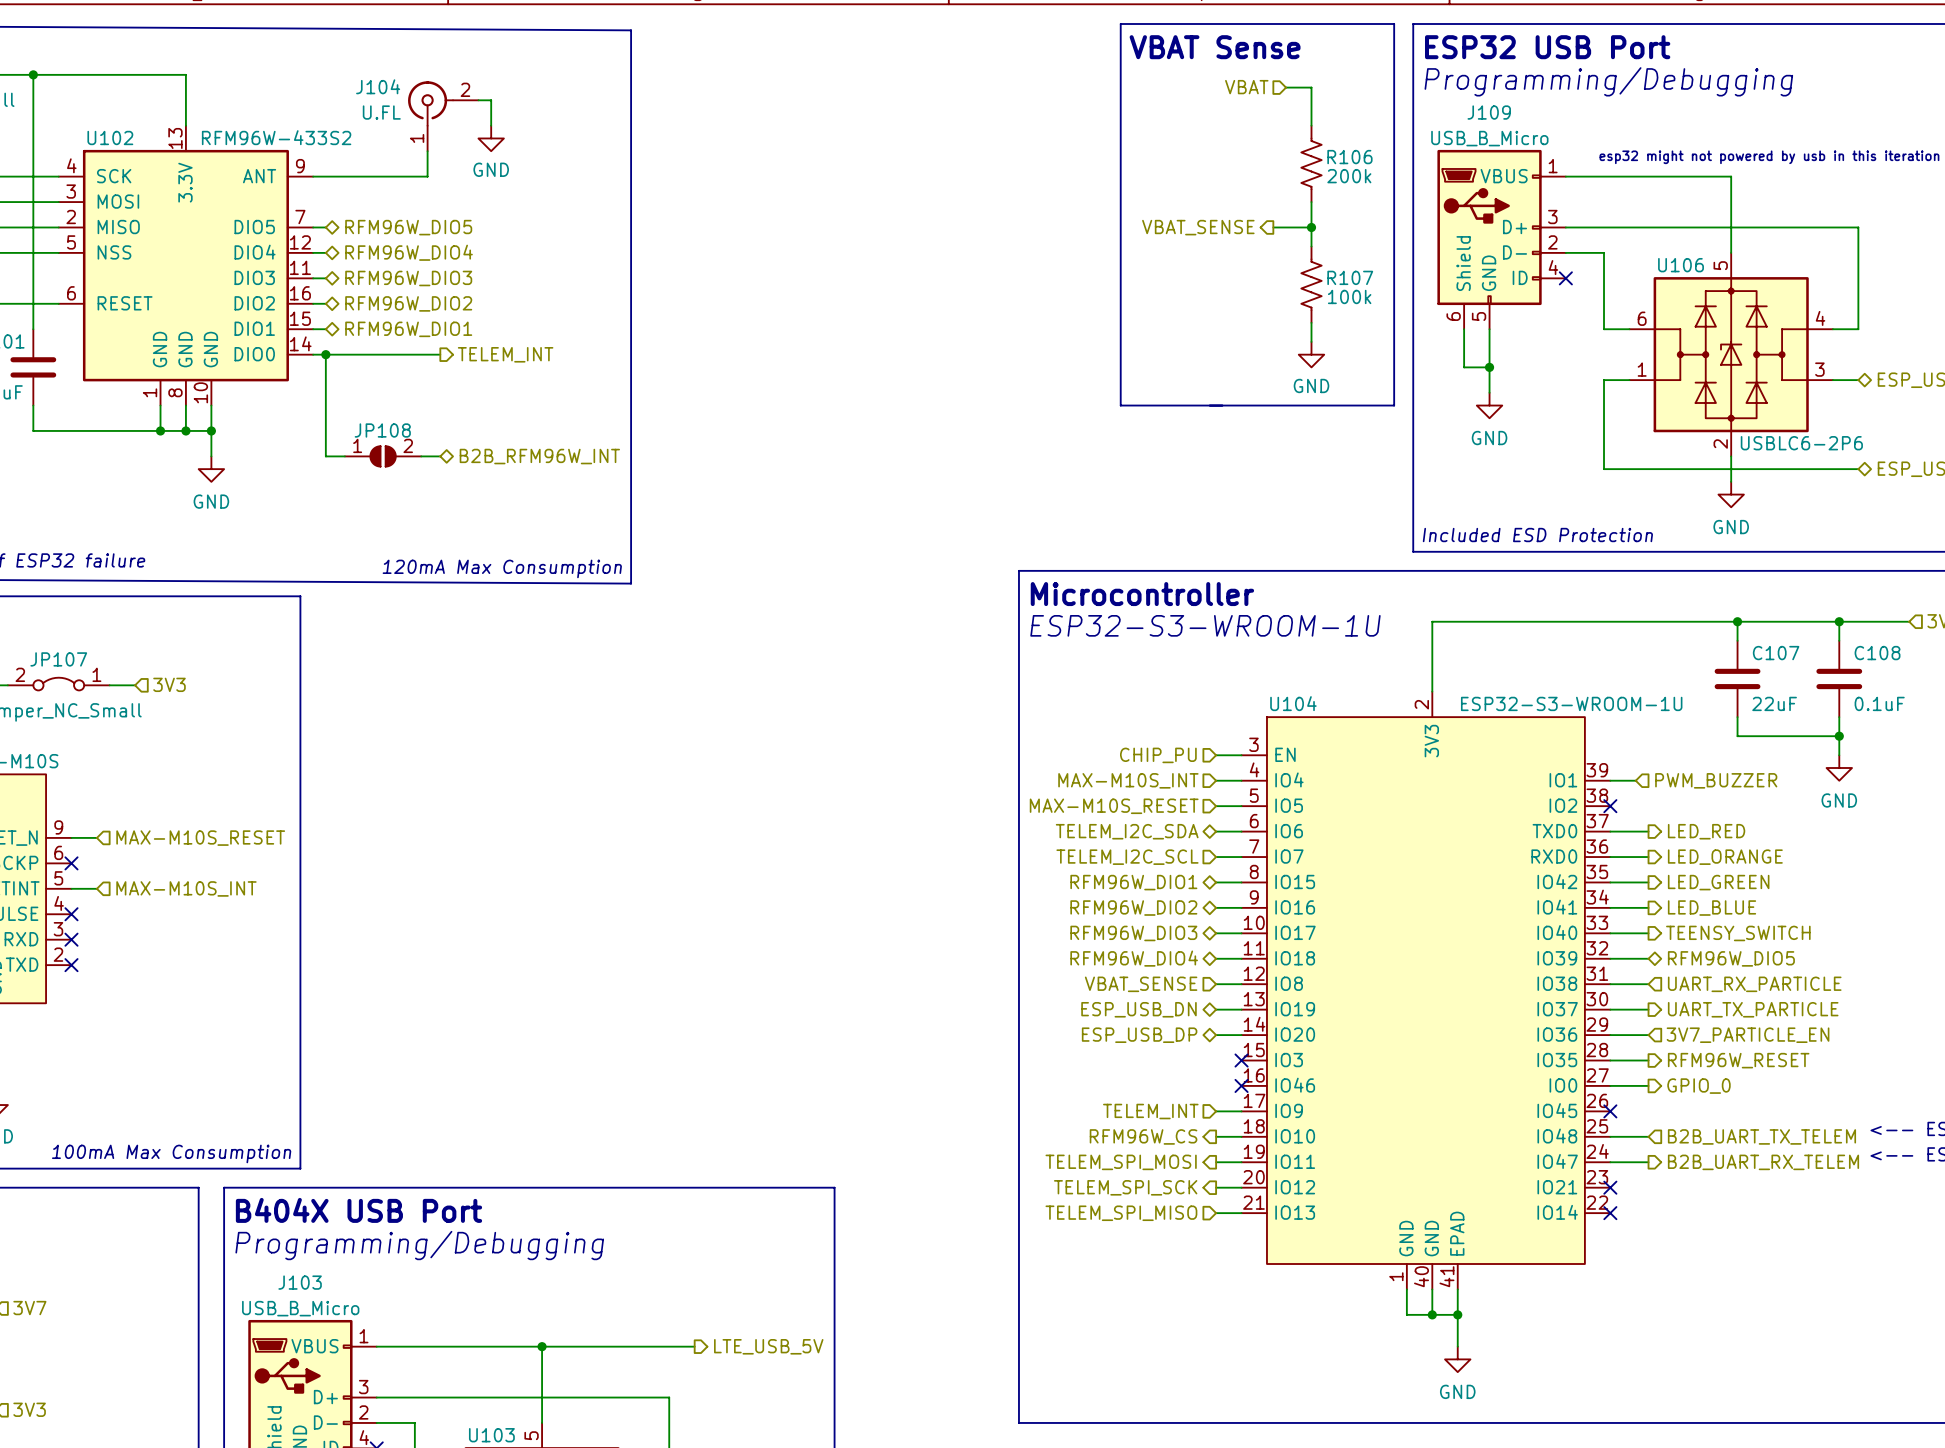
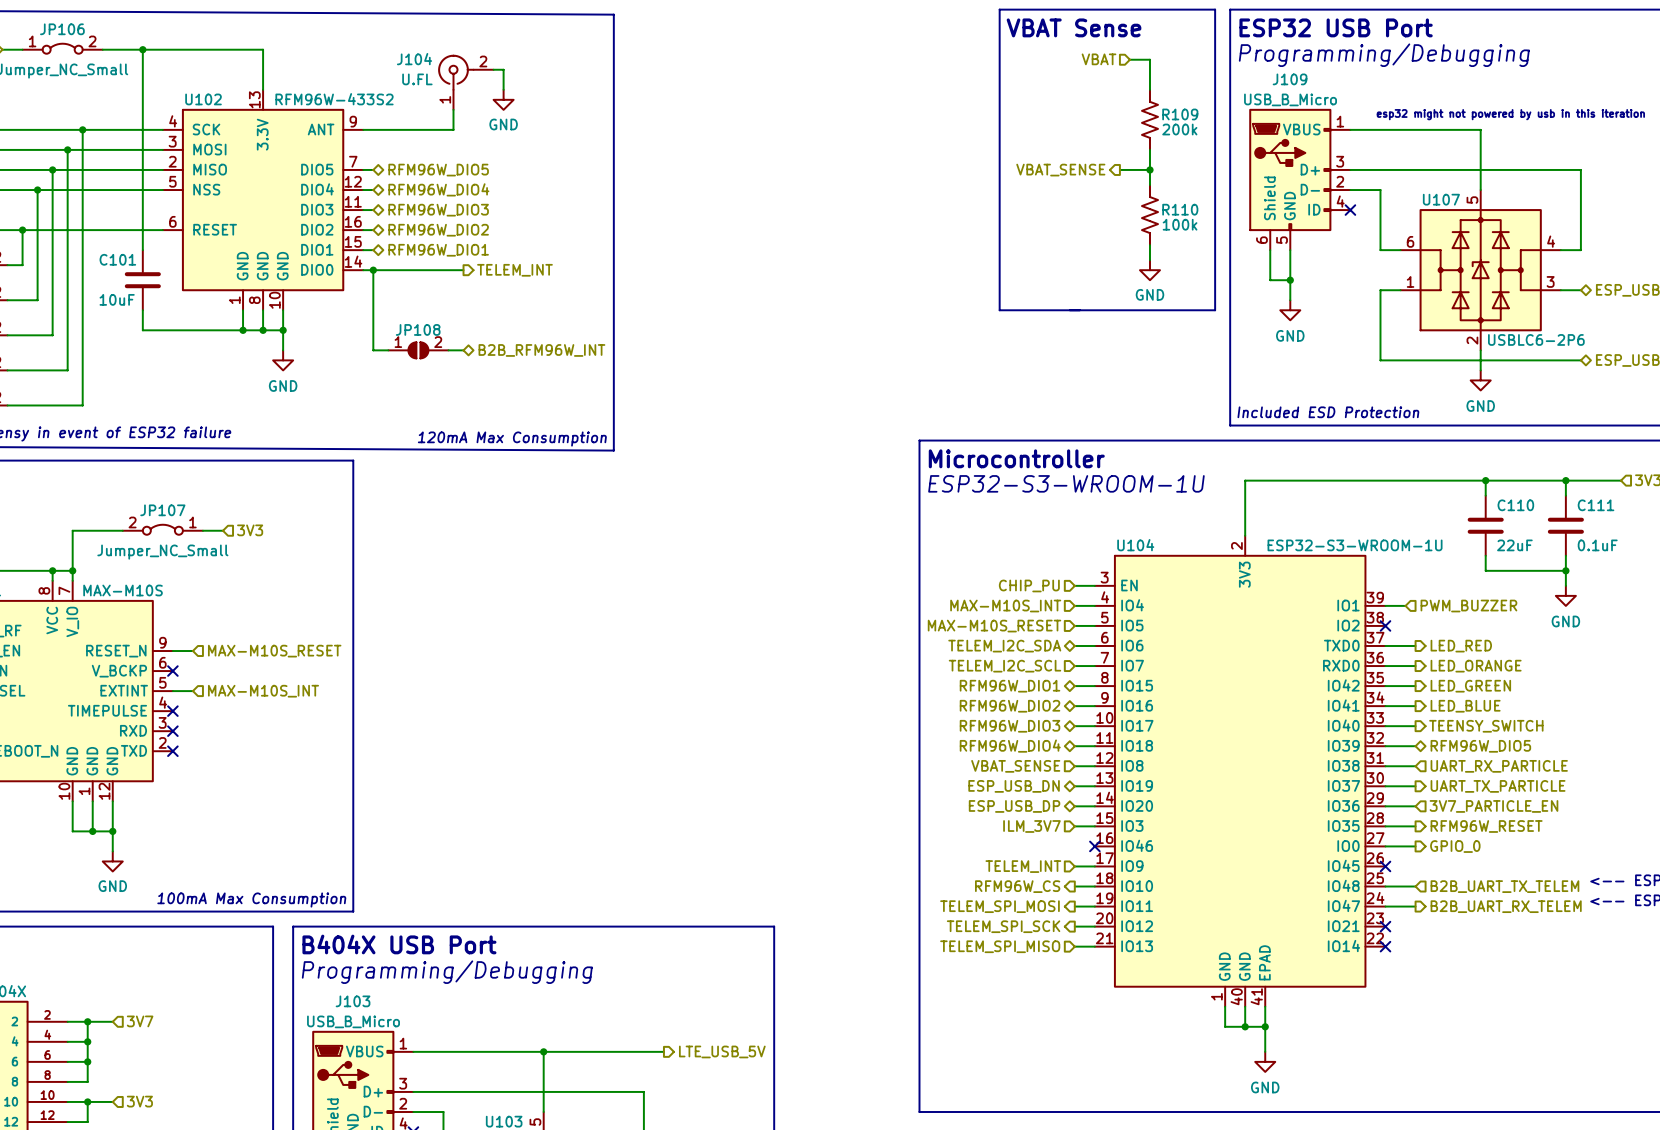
R106 name: R106 (1349, 157) -> R109 (1180, 114)
U106 name: U106 (1681, 265) -> U107 (1441, 199)
R107 name: R107 (1350, 277) -> R110 (1180, 209)
C107 name: C107 (1776, 653) -> C110 (1515, 505)
C108 name: C108 (1877, 653) -> C111 (1596, 505)
hierarchical label: none -> ILM_3V7 (1031, 826)
wire: none -> (1074, 826) (1094, 826)
no-connect mark: (1241, 1060) -> none

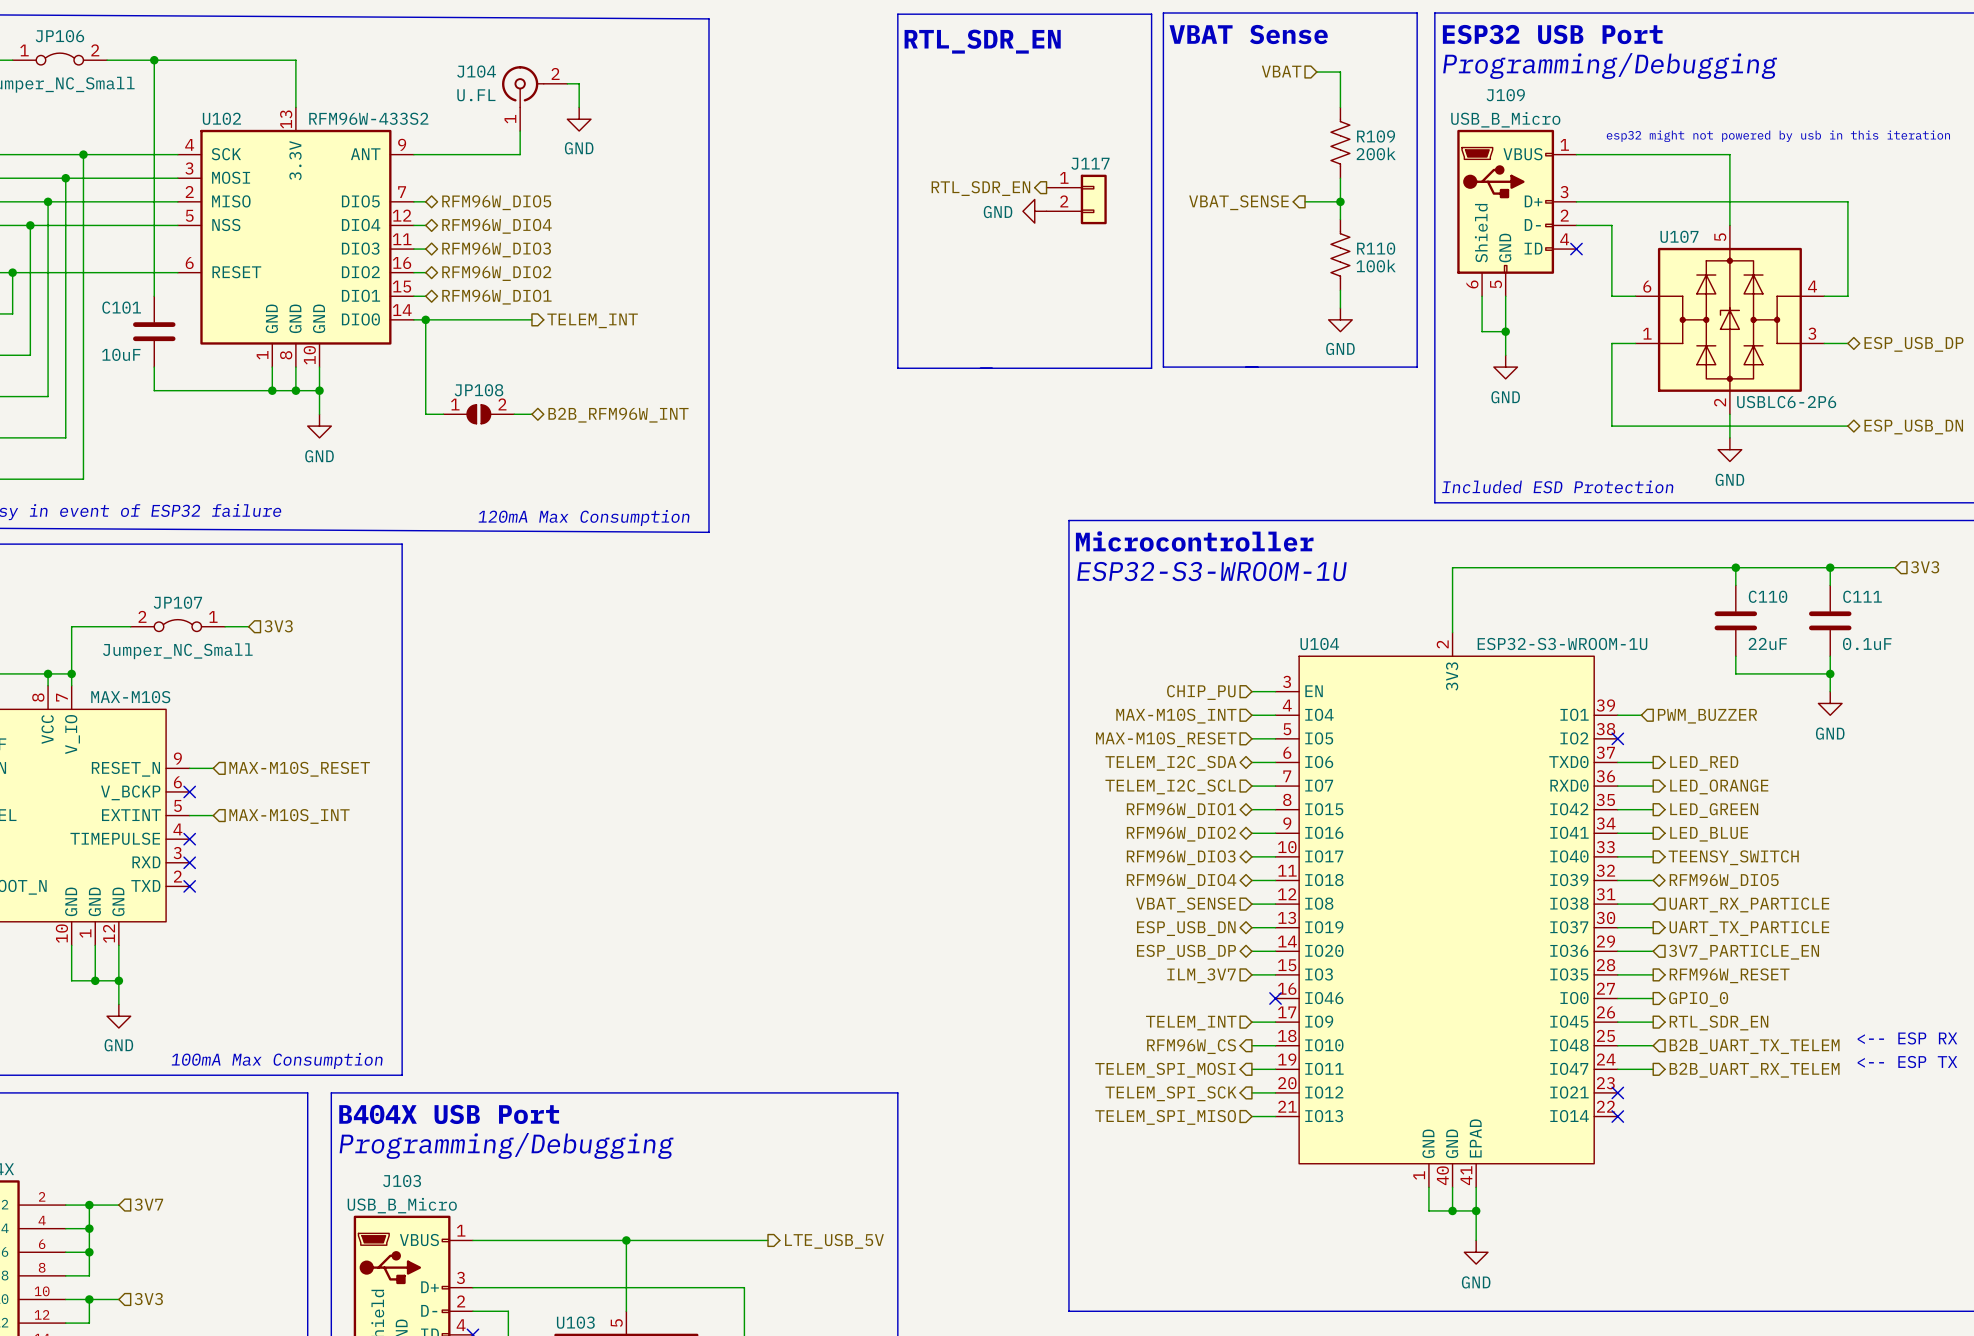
line: none -> (897, 14) (1151, 14) (1151, 368) (897, 368) (897, 14)
text: none -> RTL_SDR_EN (982, 41)
hierarchical label: none -> RTL_SDR_EN (980, 188)
J117: none -> (1076, 199)
power symbol: none -> GND (1034, 211)
wire: none -> (1617, 1022) (1653, 1022)
no-connect mark: (1385, 866) -> none
hierarchical label: none -> RTL_SDR_EN (1719, 1023)

